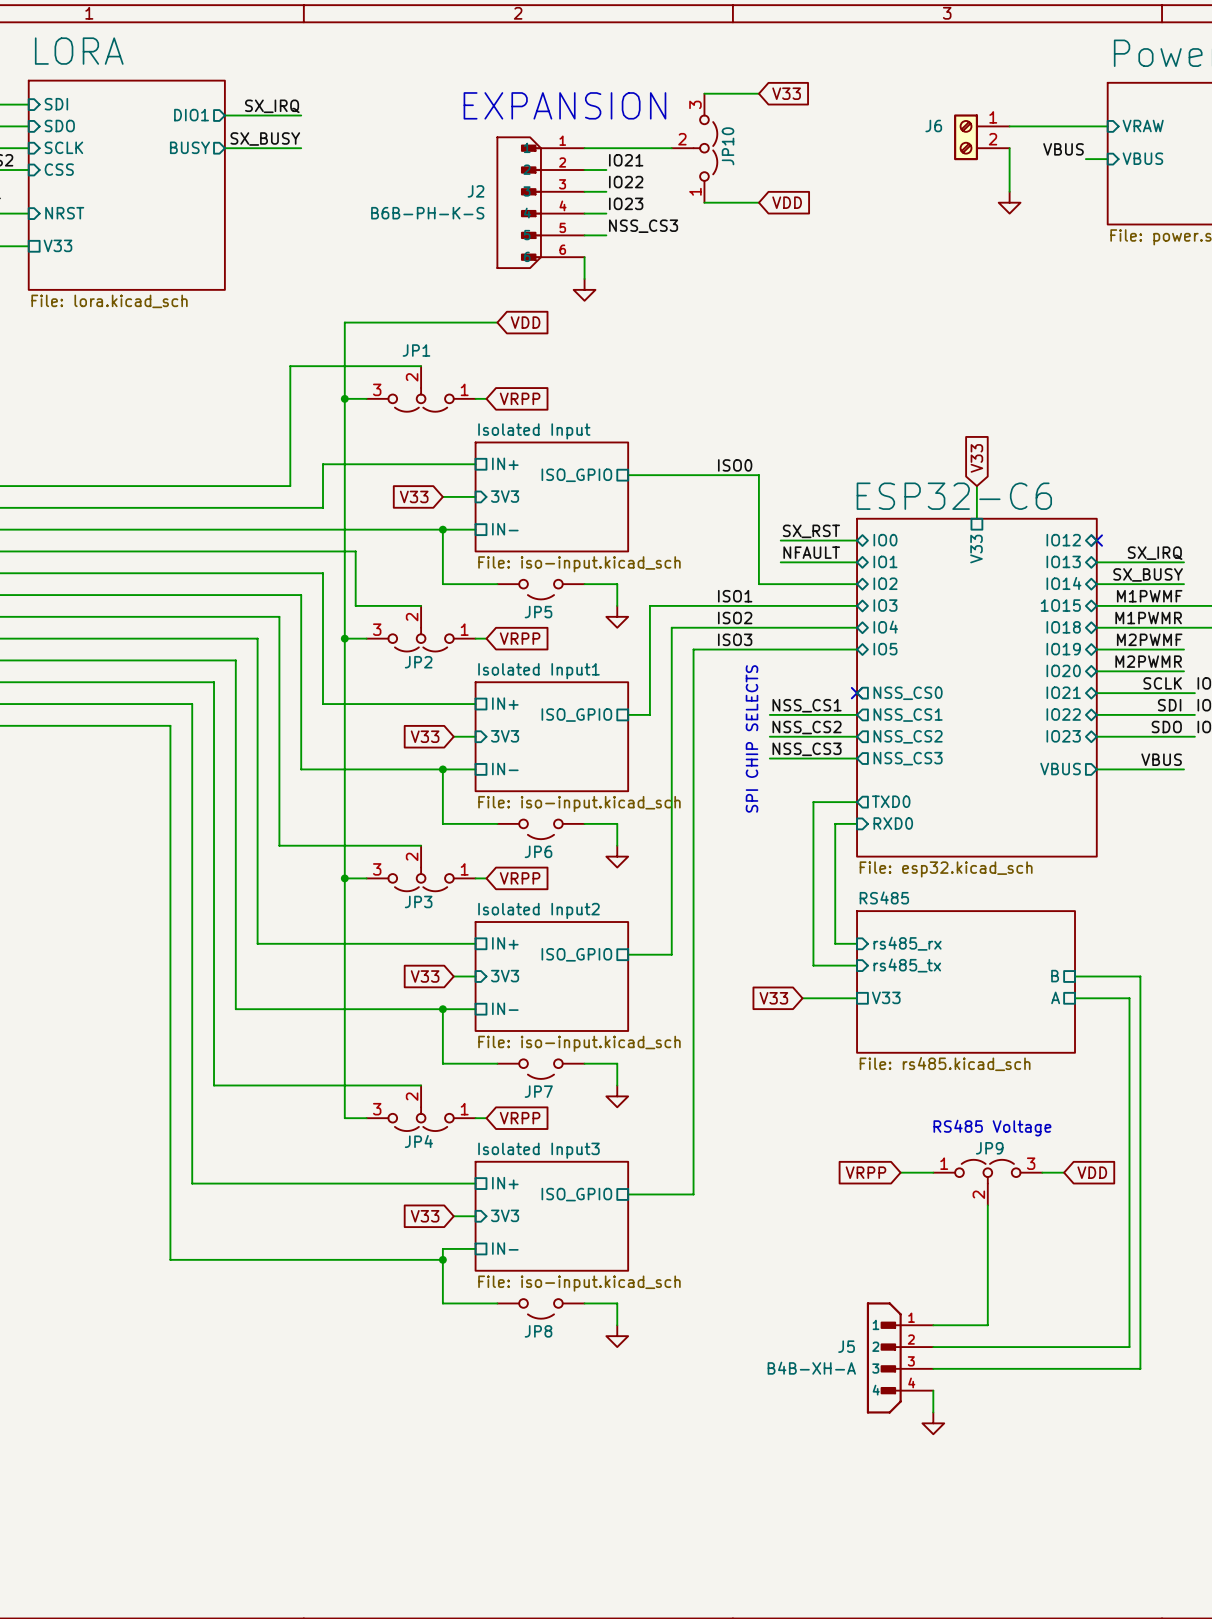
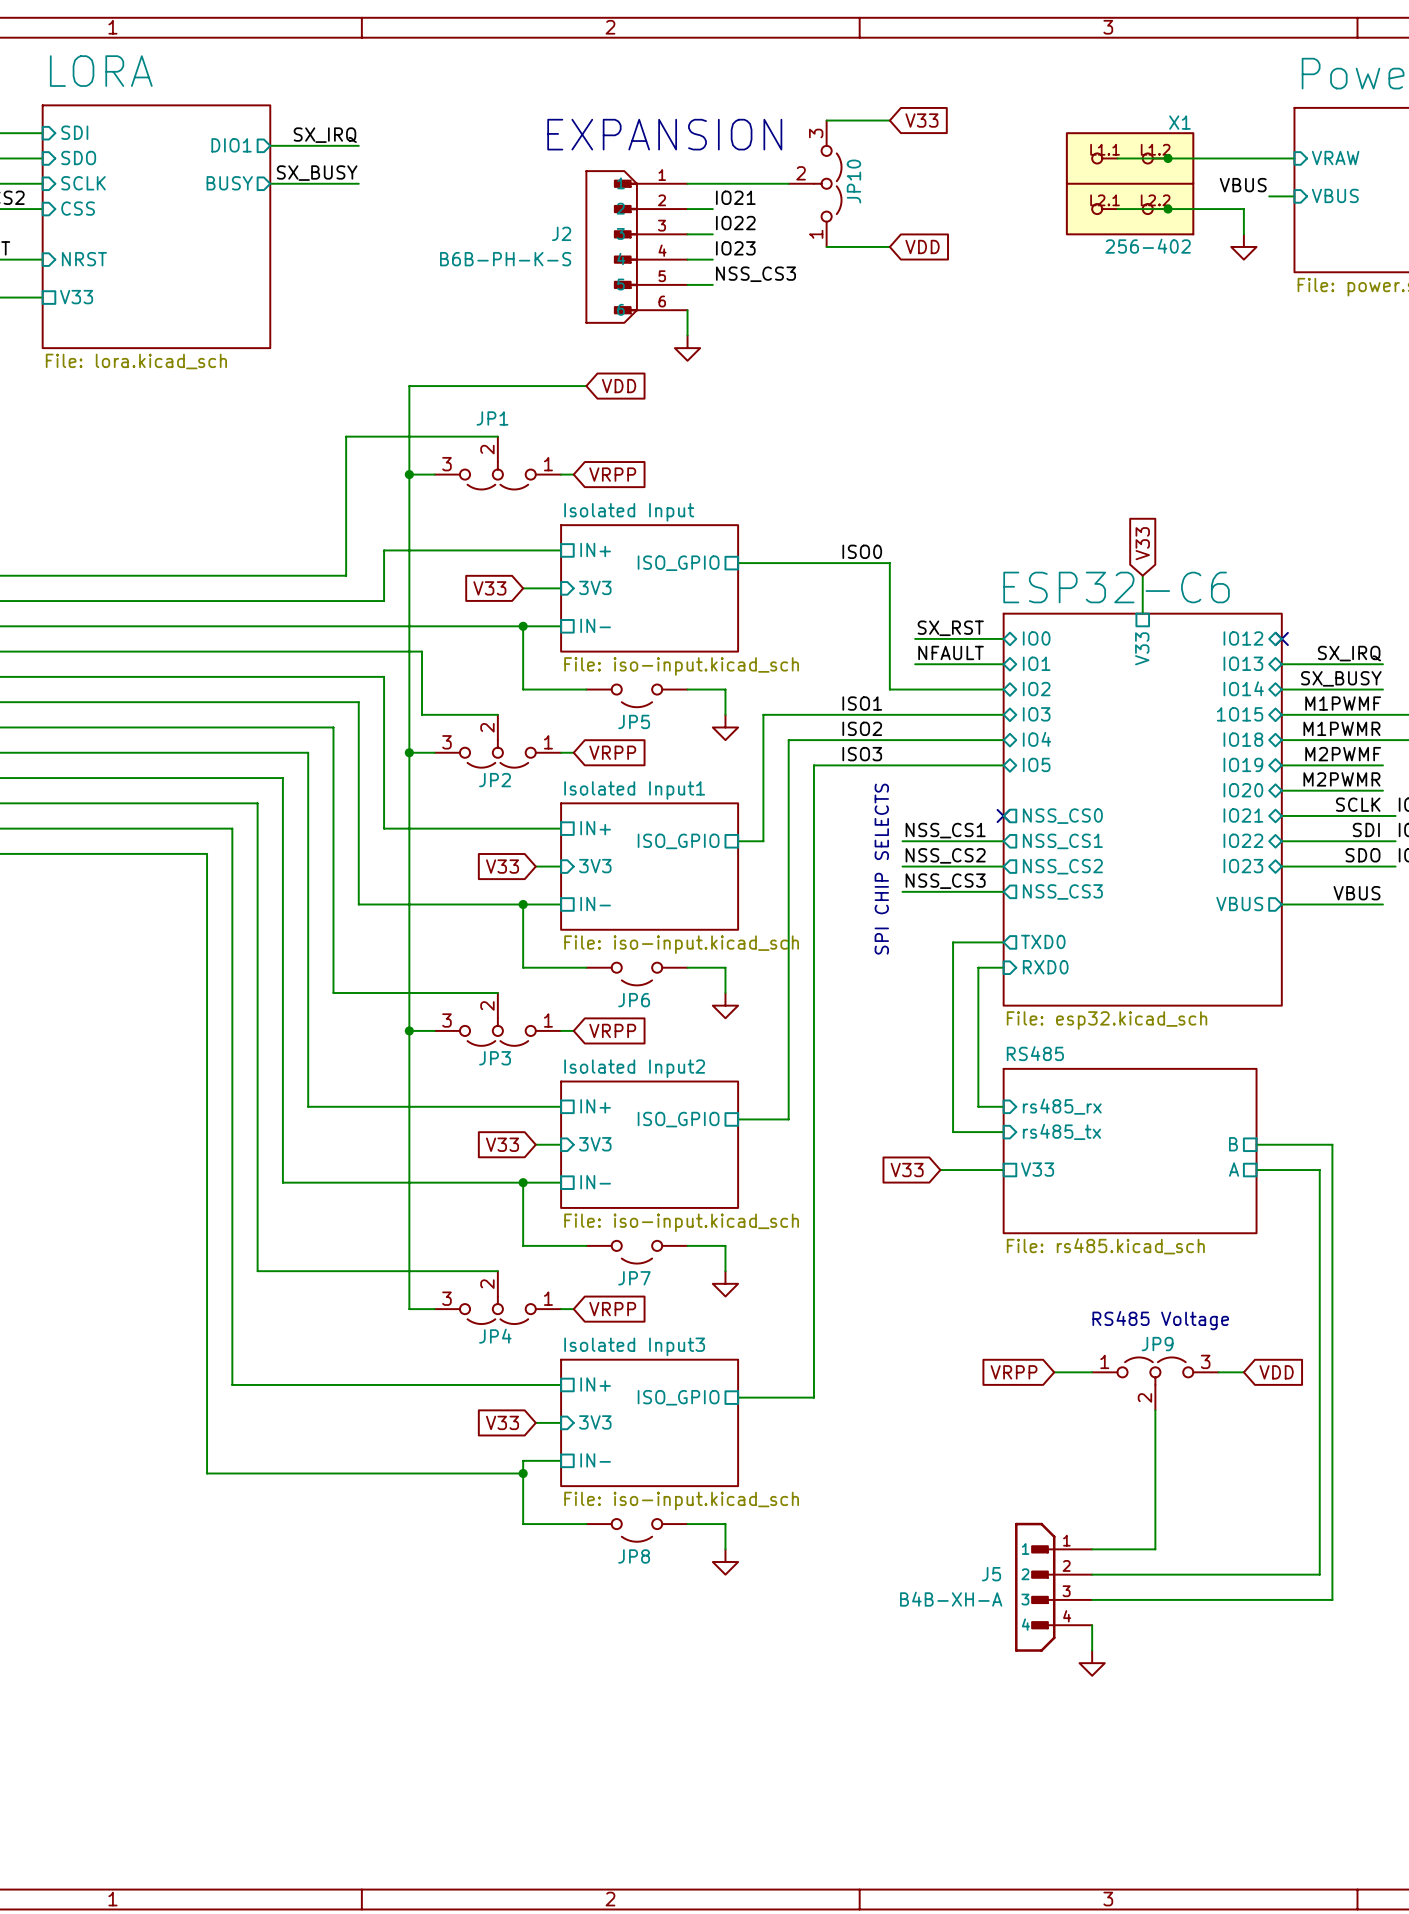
junction: none -> (1168, 158)
J6: (981, 137) -> none
X1: none -> 256-402 (1130, 183)
wire: none -> (1117, 209) (1243, 209) (1243, 234)
junction: none -> (1168, 209)
power symbol position: (1009, 202) -> (1243, 246)

